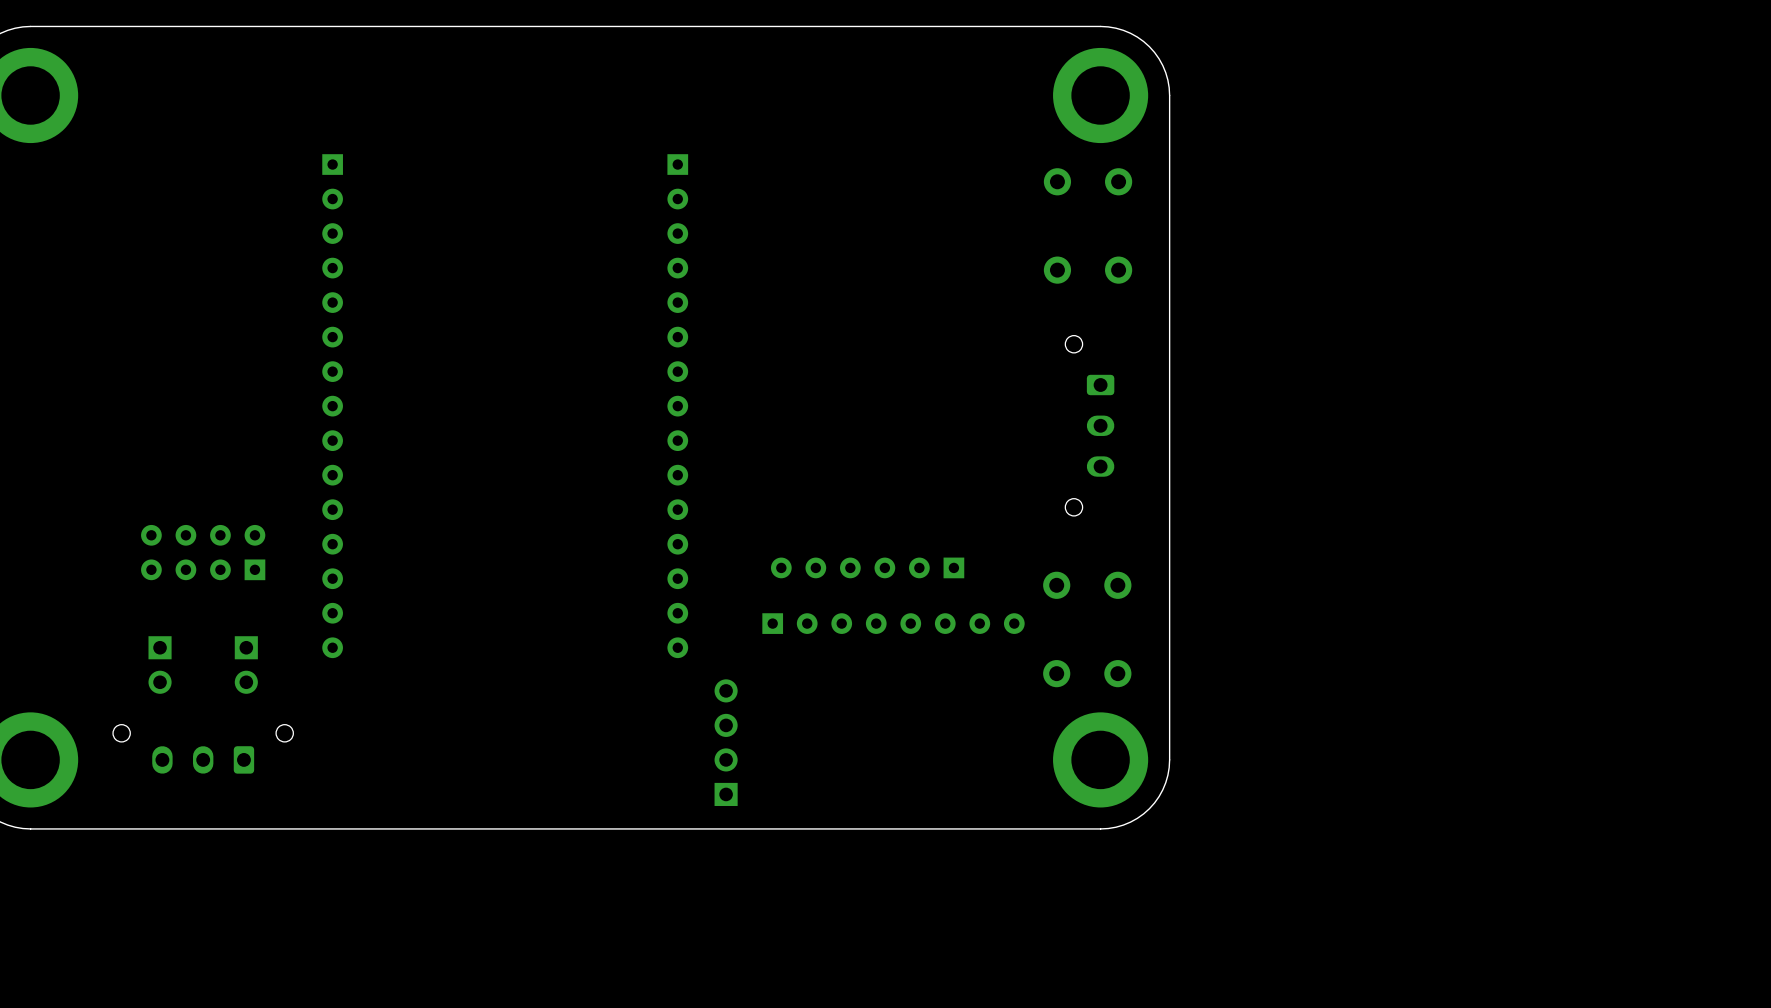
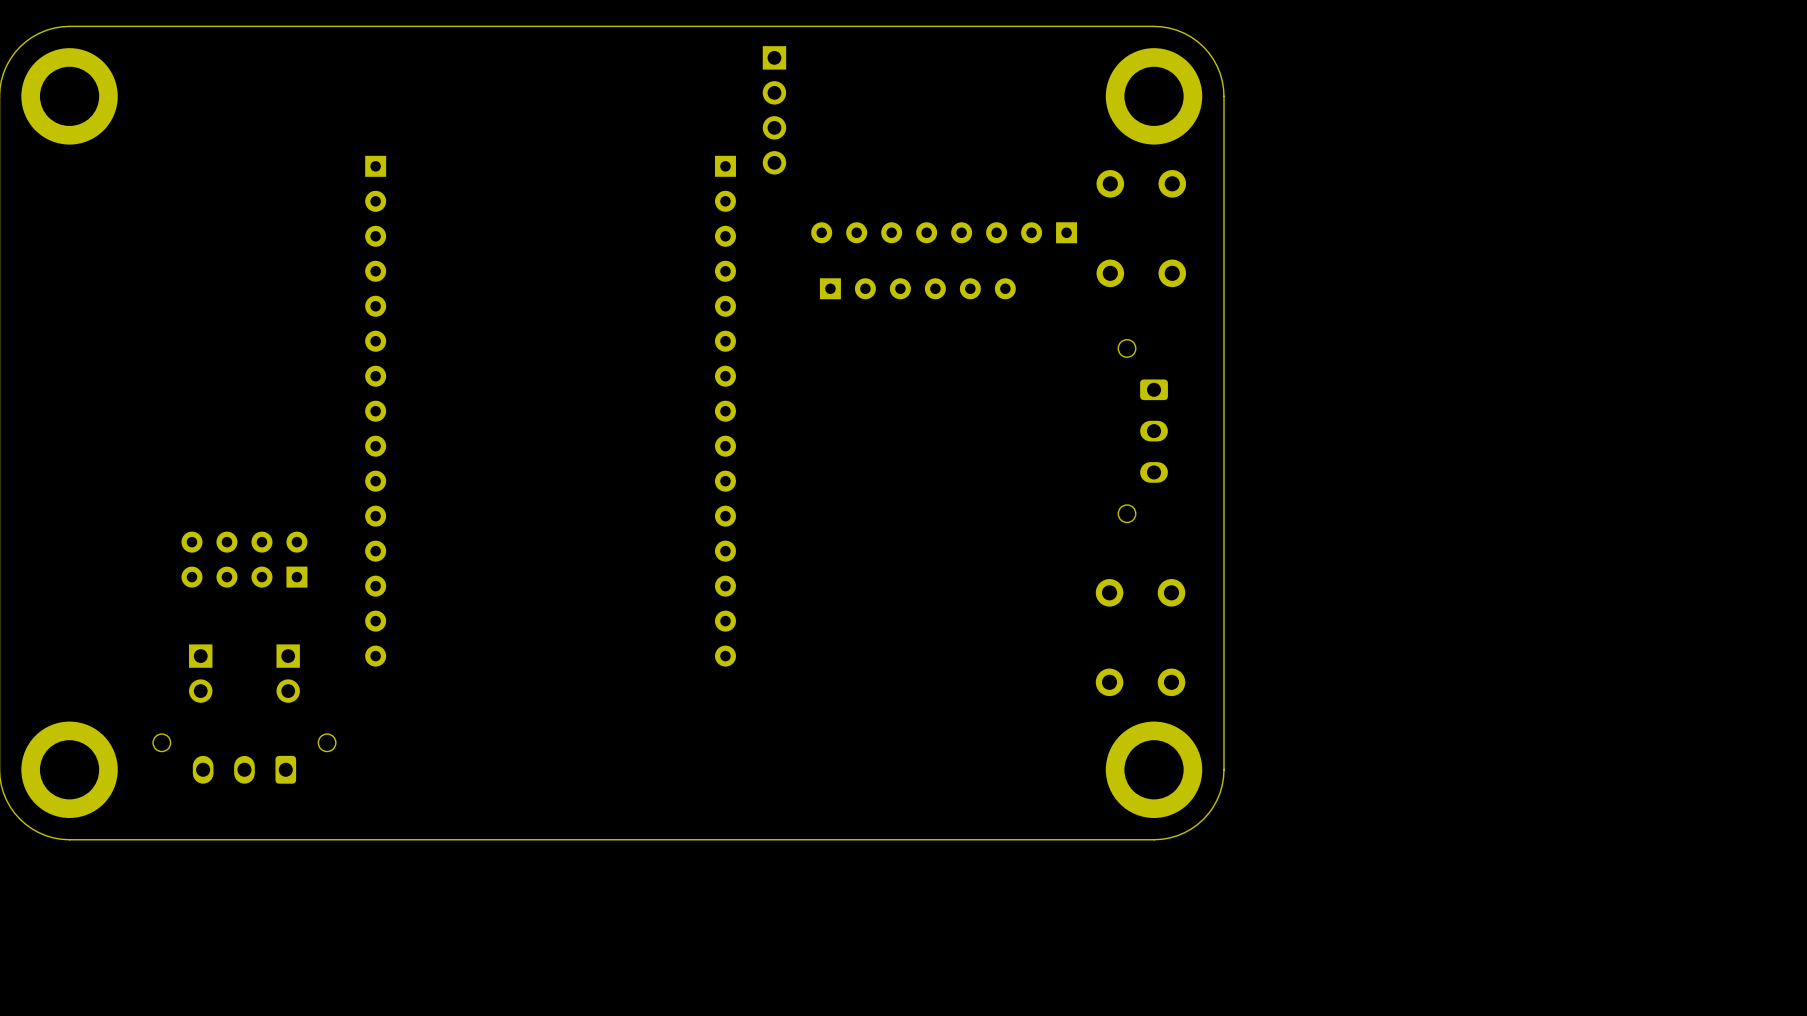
part: none -> (774, 110)
part: none -> (944, 232)
part rotation: 0° (867, 567) -> 180° (917, 288)
part position: (867, 567) -> (917, 288)
part: (893, 623) -> none
part: (726, 742) -> none

